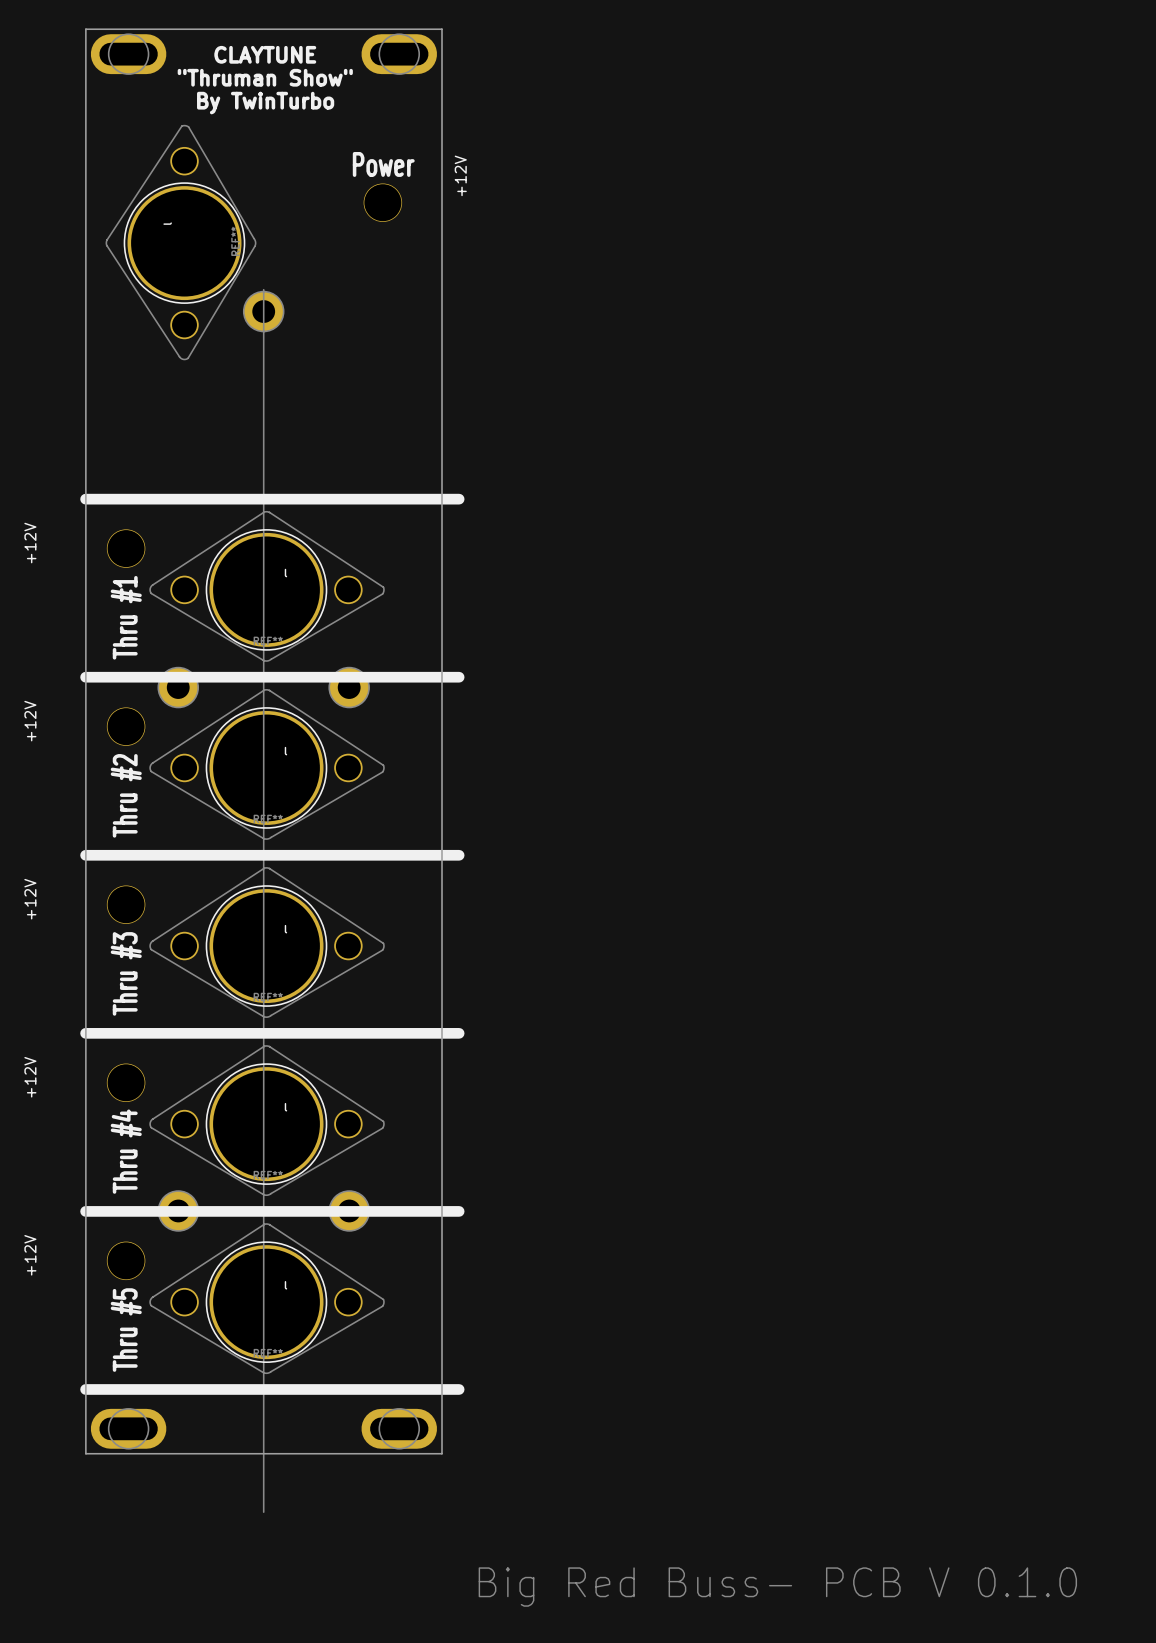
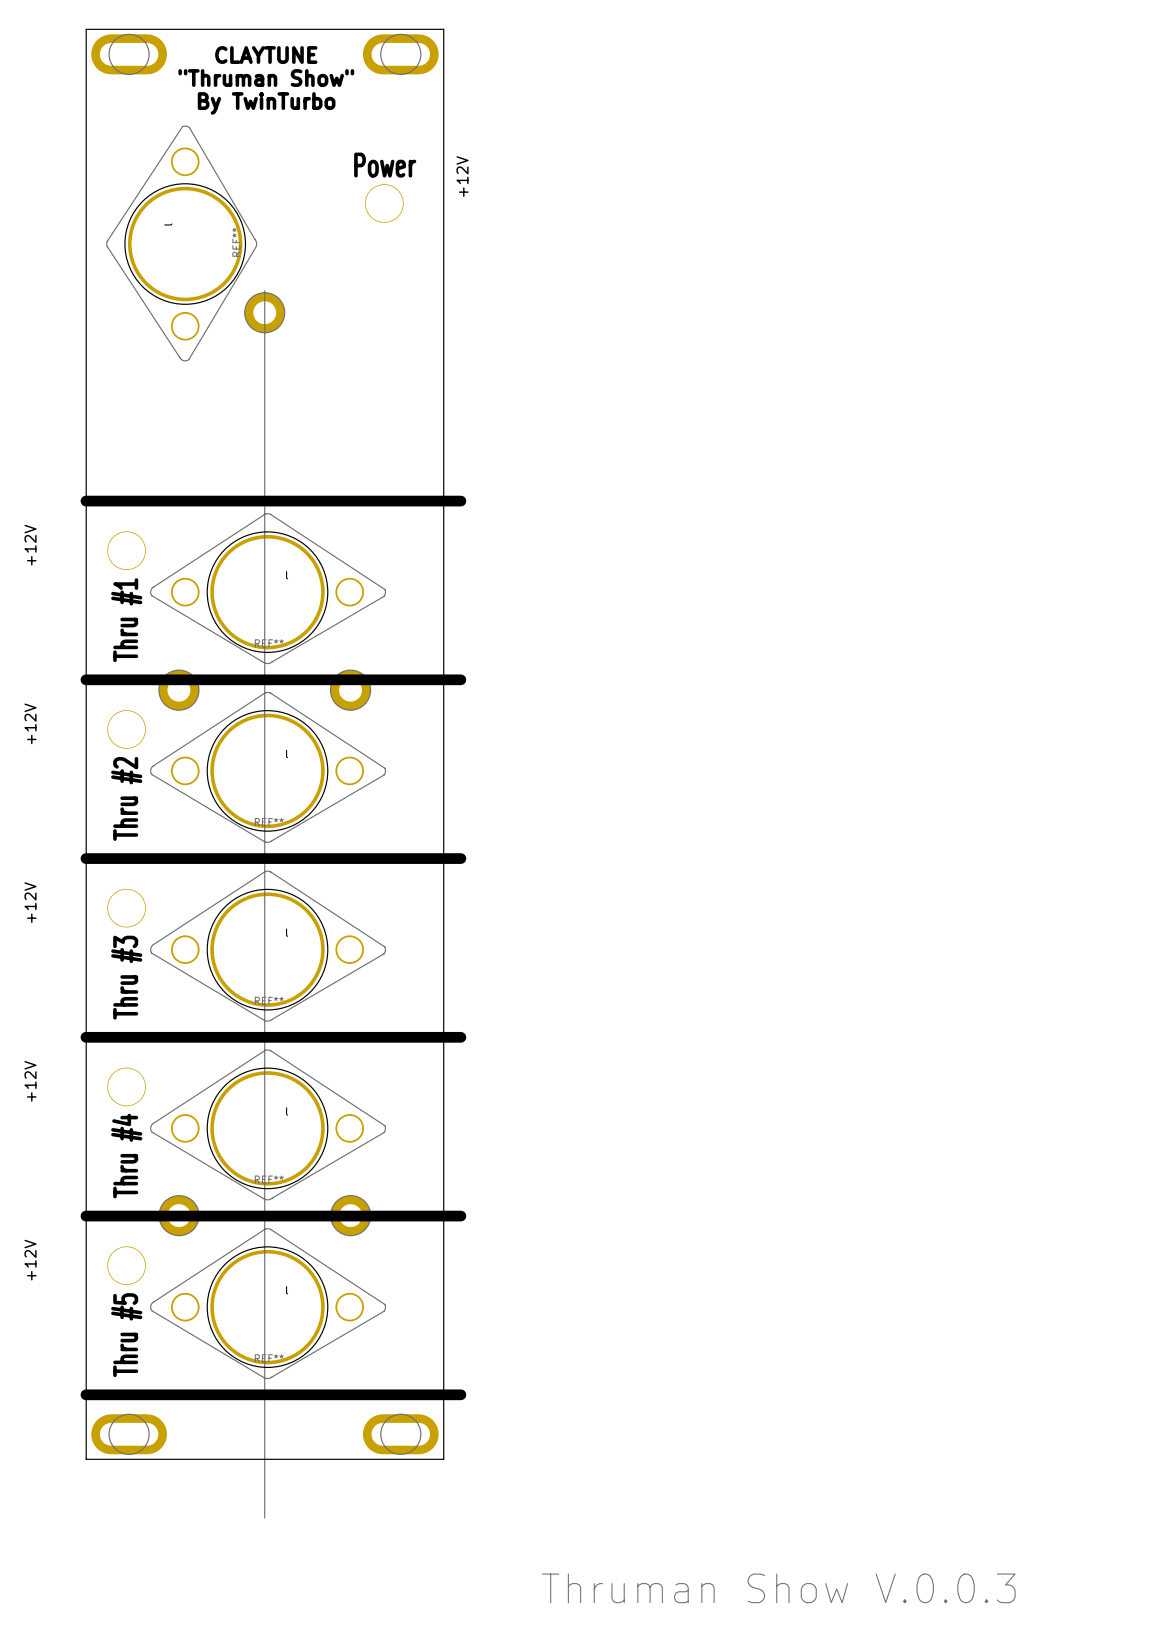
text: Big Red Buss- PCB V 0.1.0 (777, 1587) -> Thruman Show V.0.0.3 (778, 1588)

